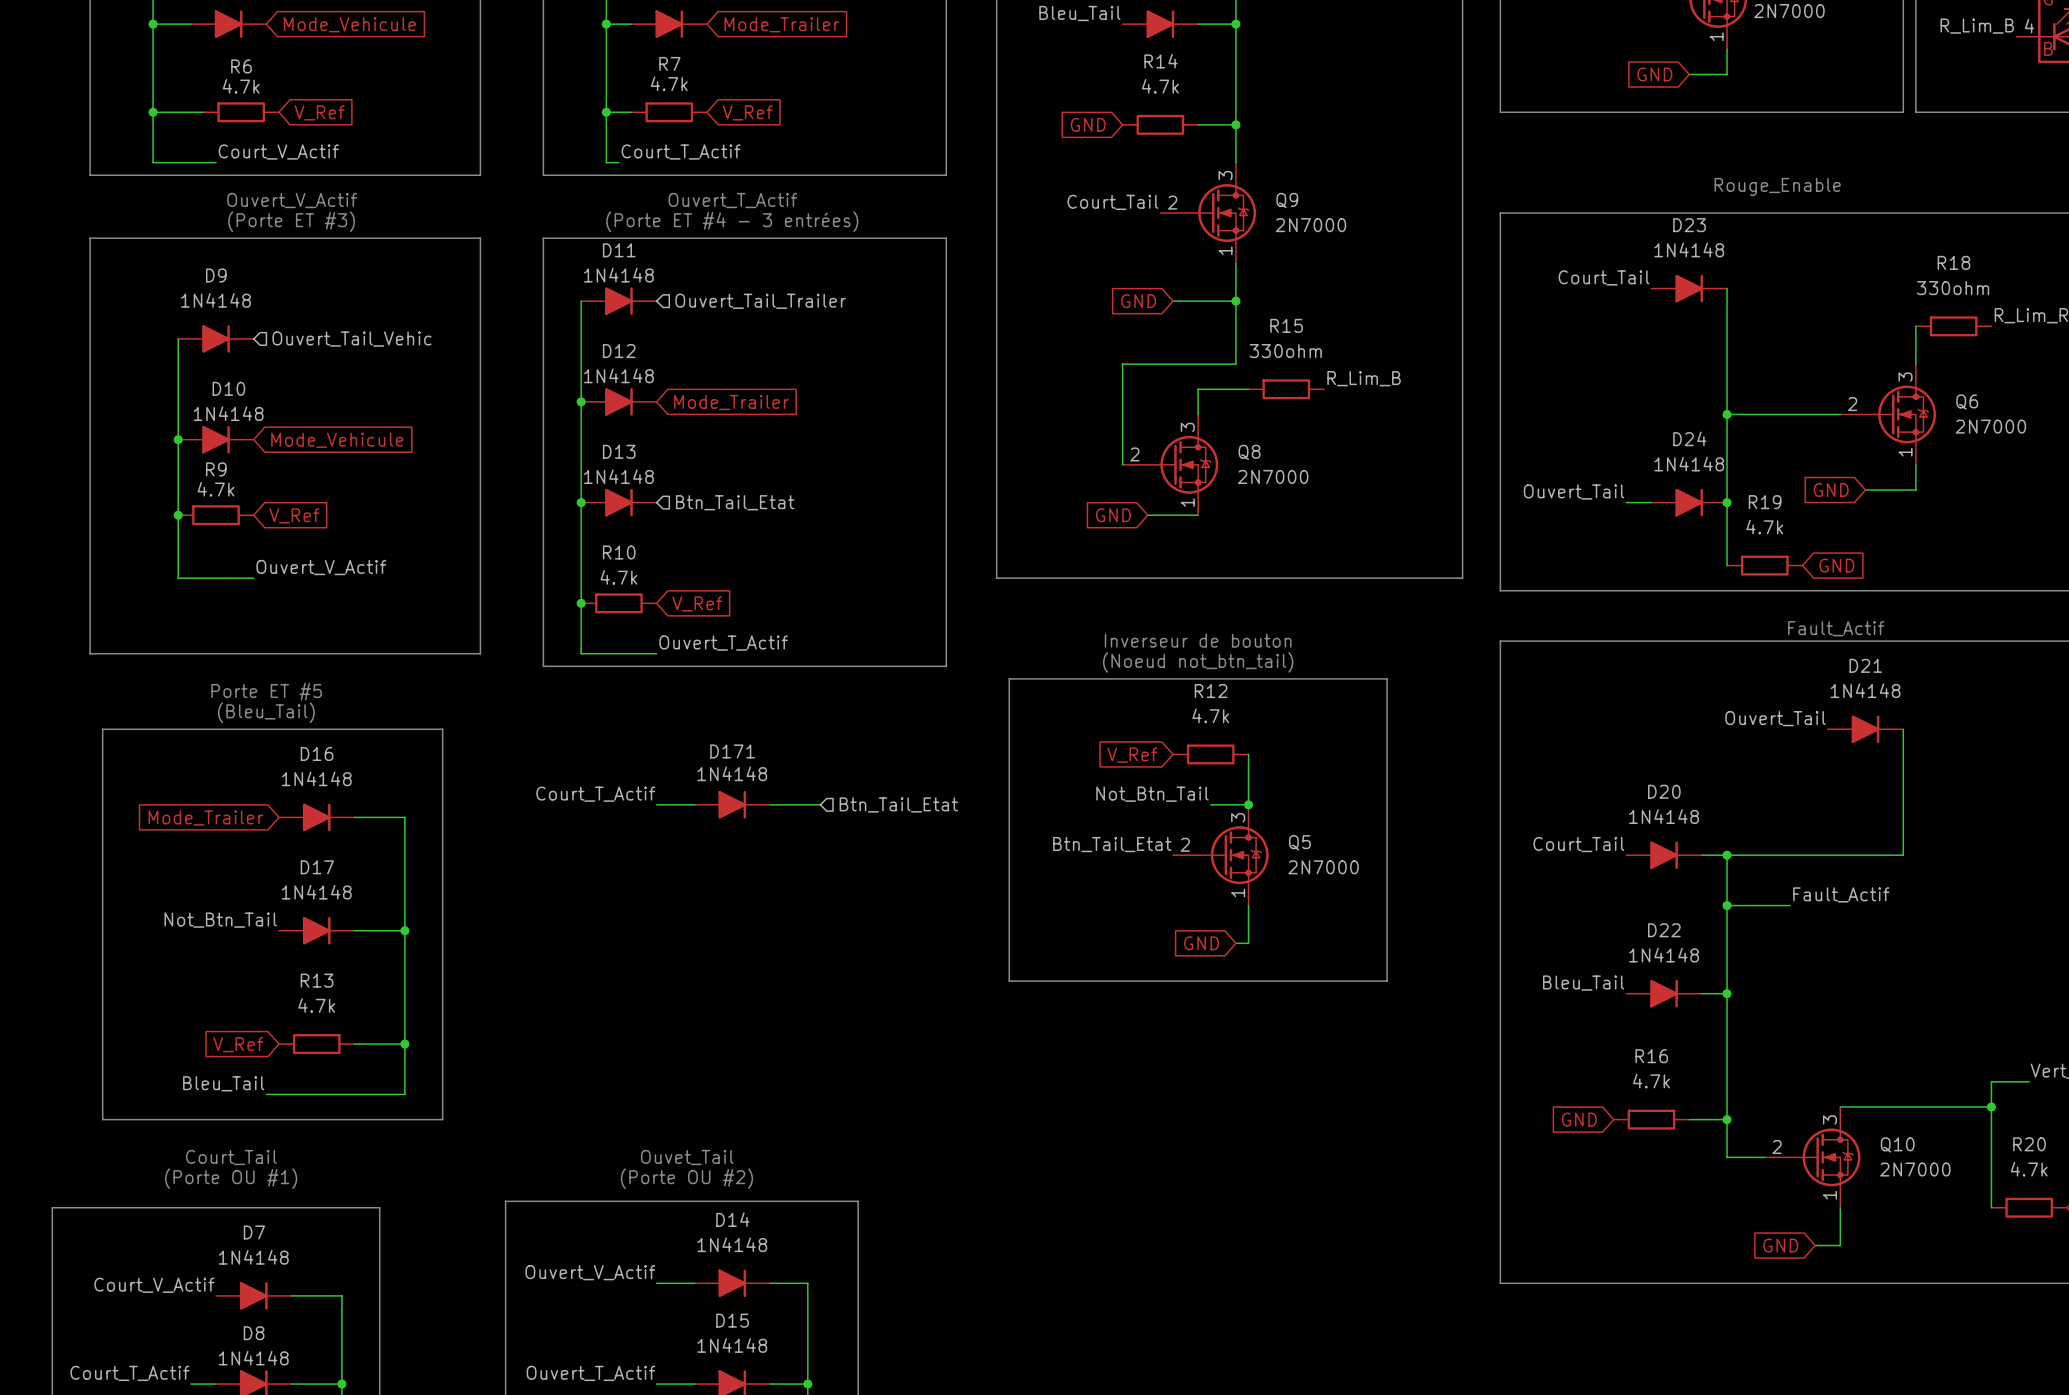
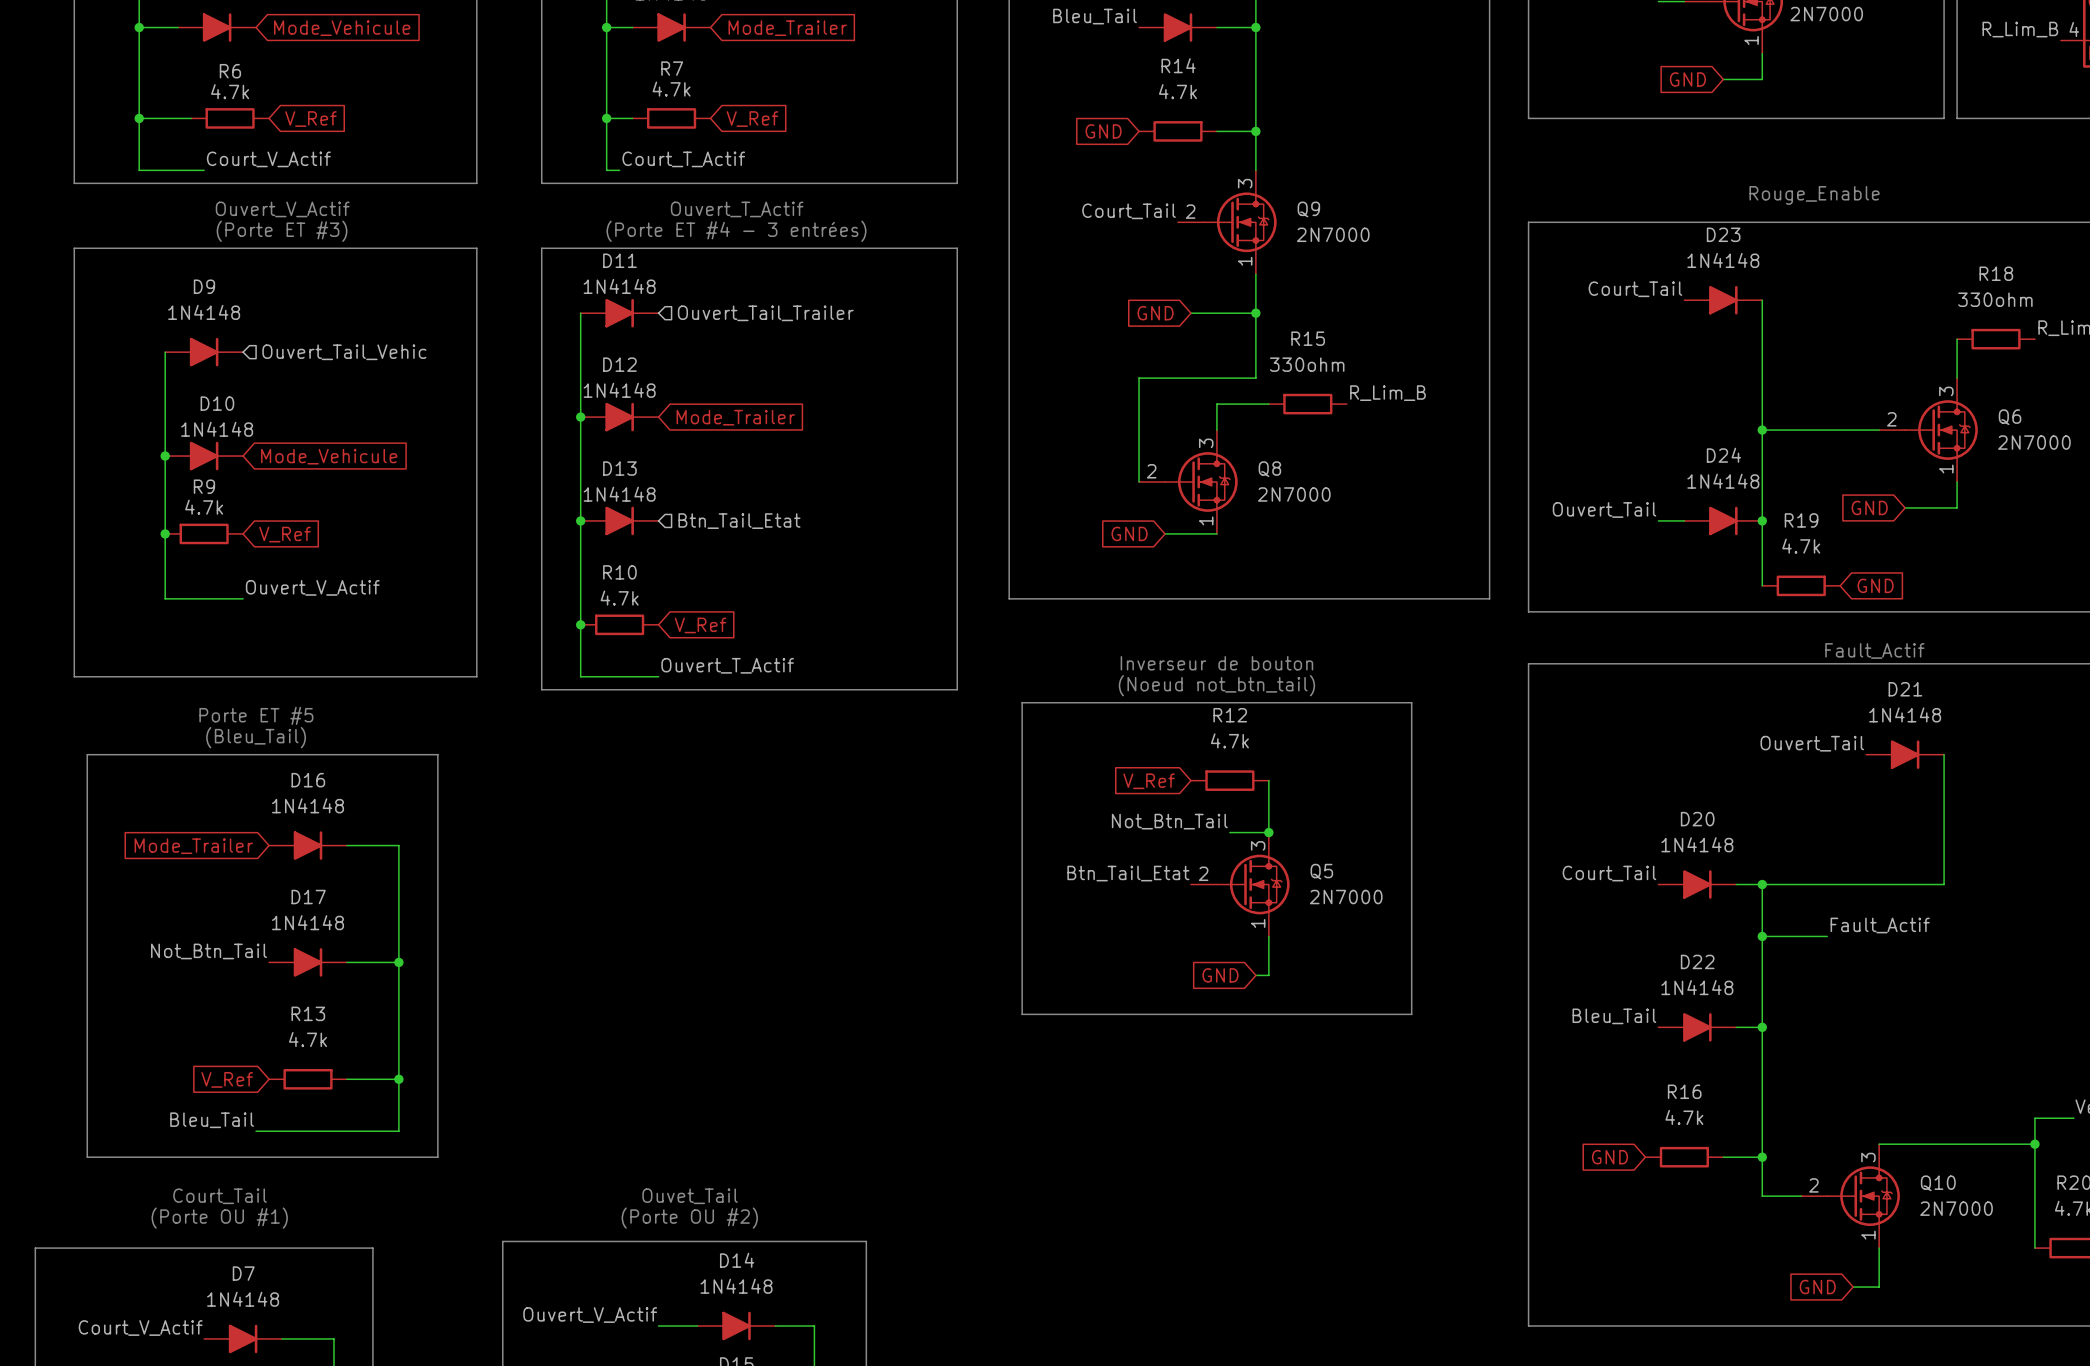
label: Court_T_Actif (595, 794) -> none
wire: (656, 804) (694, 804) -> none
D171: 1N4148 (732, 804) -> none
wire: (770, 804) (820, 804) -> none
hierarchical label: Btn_Tail_Etat (898, 804) -> none

